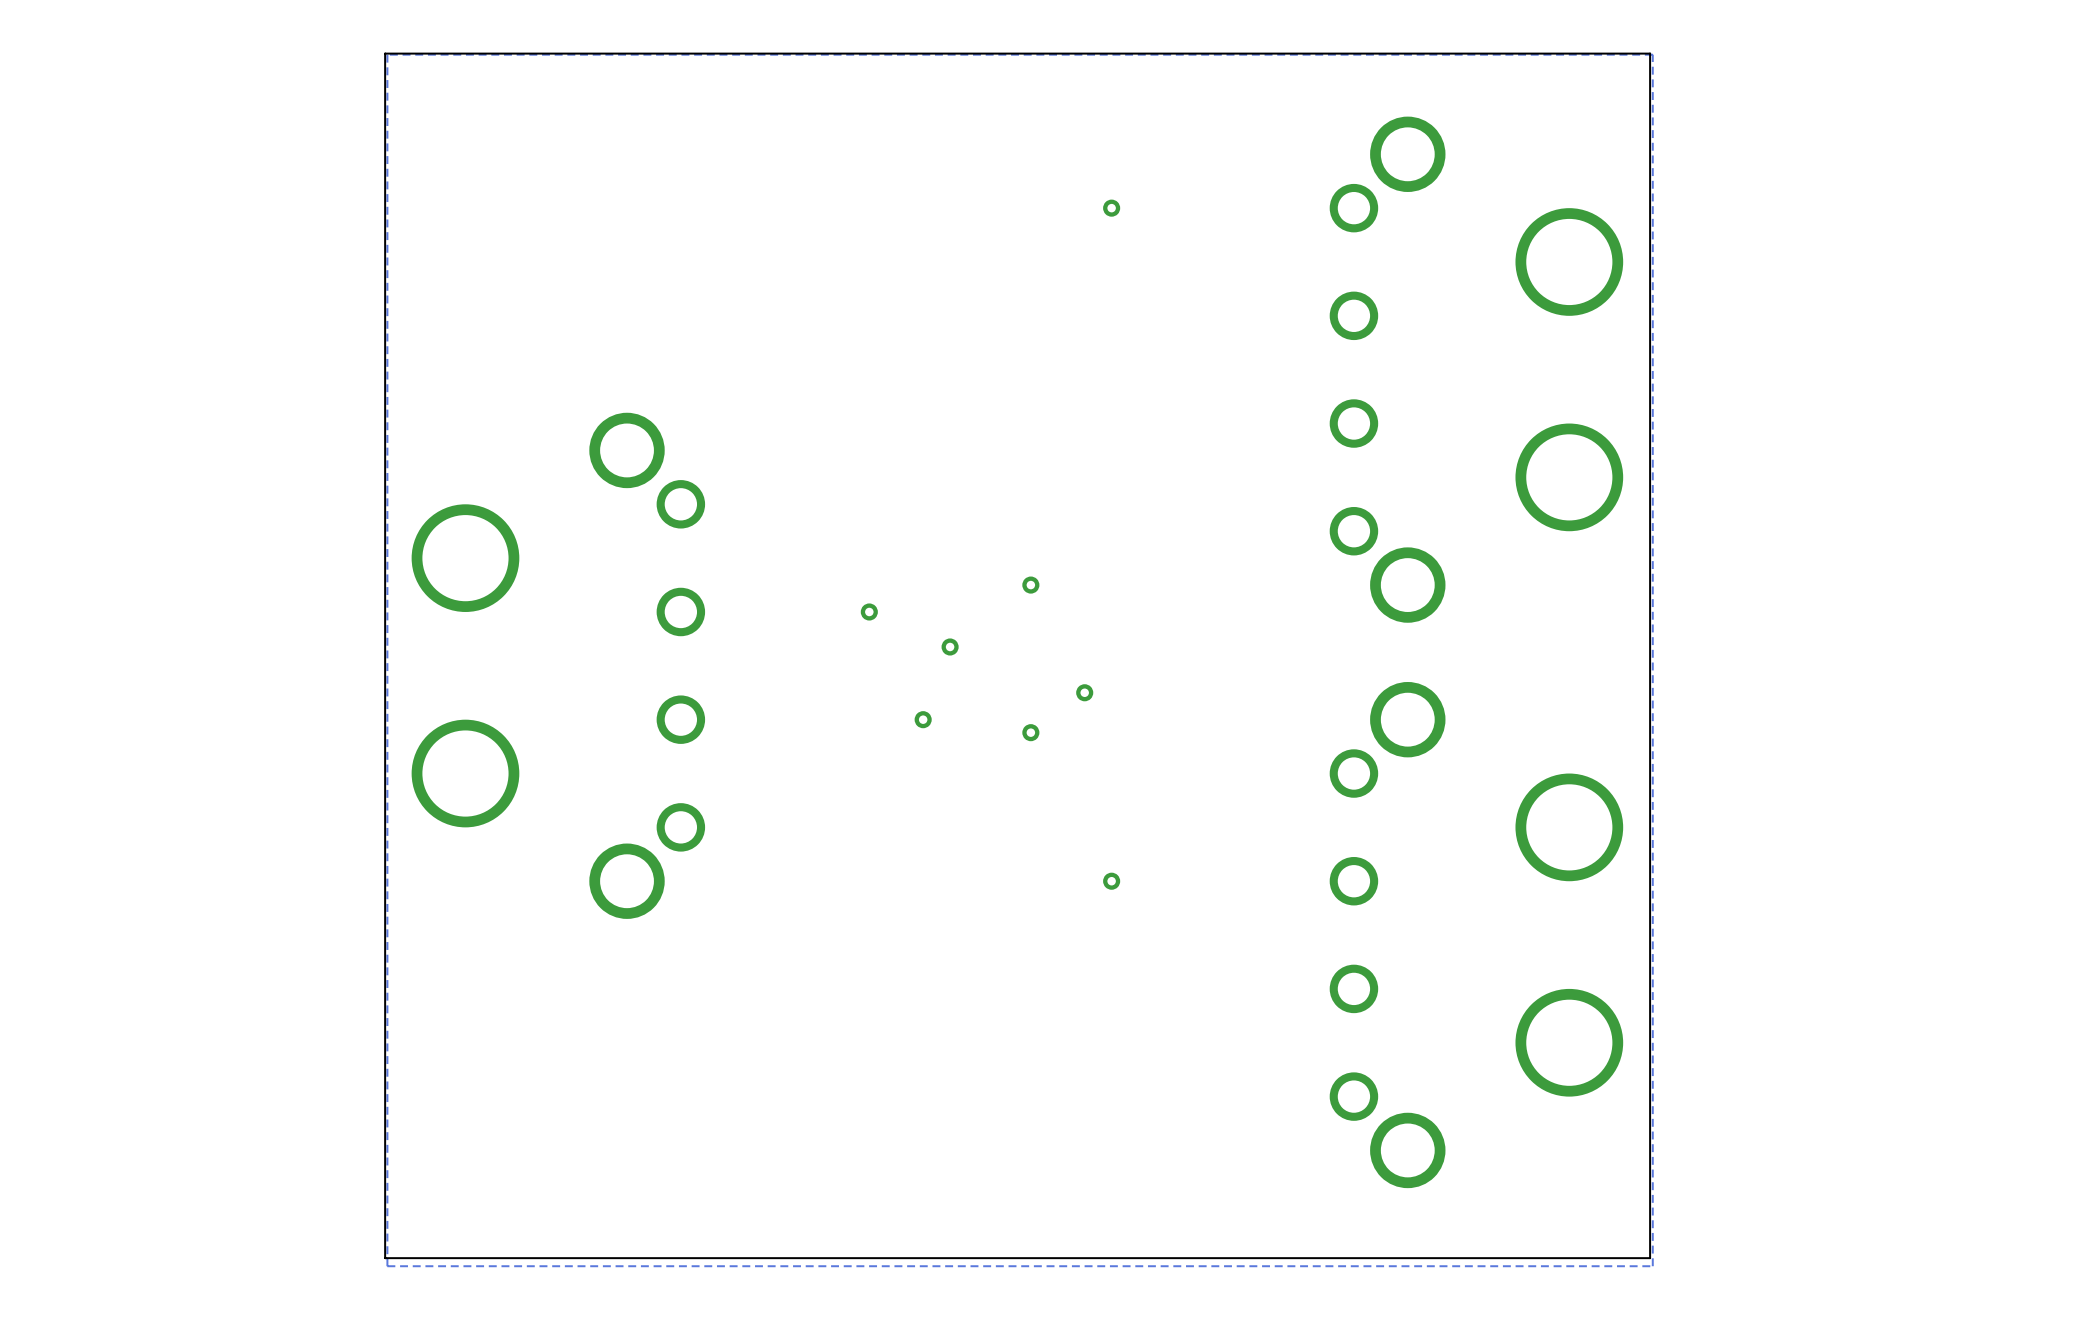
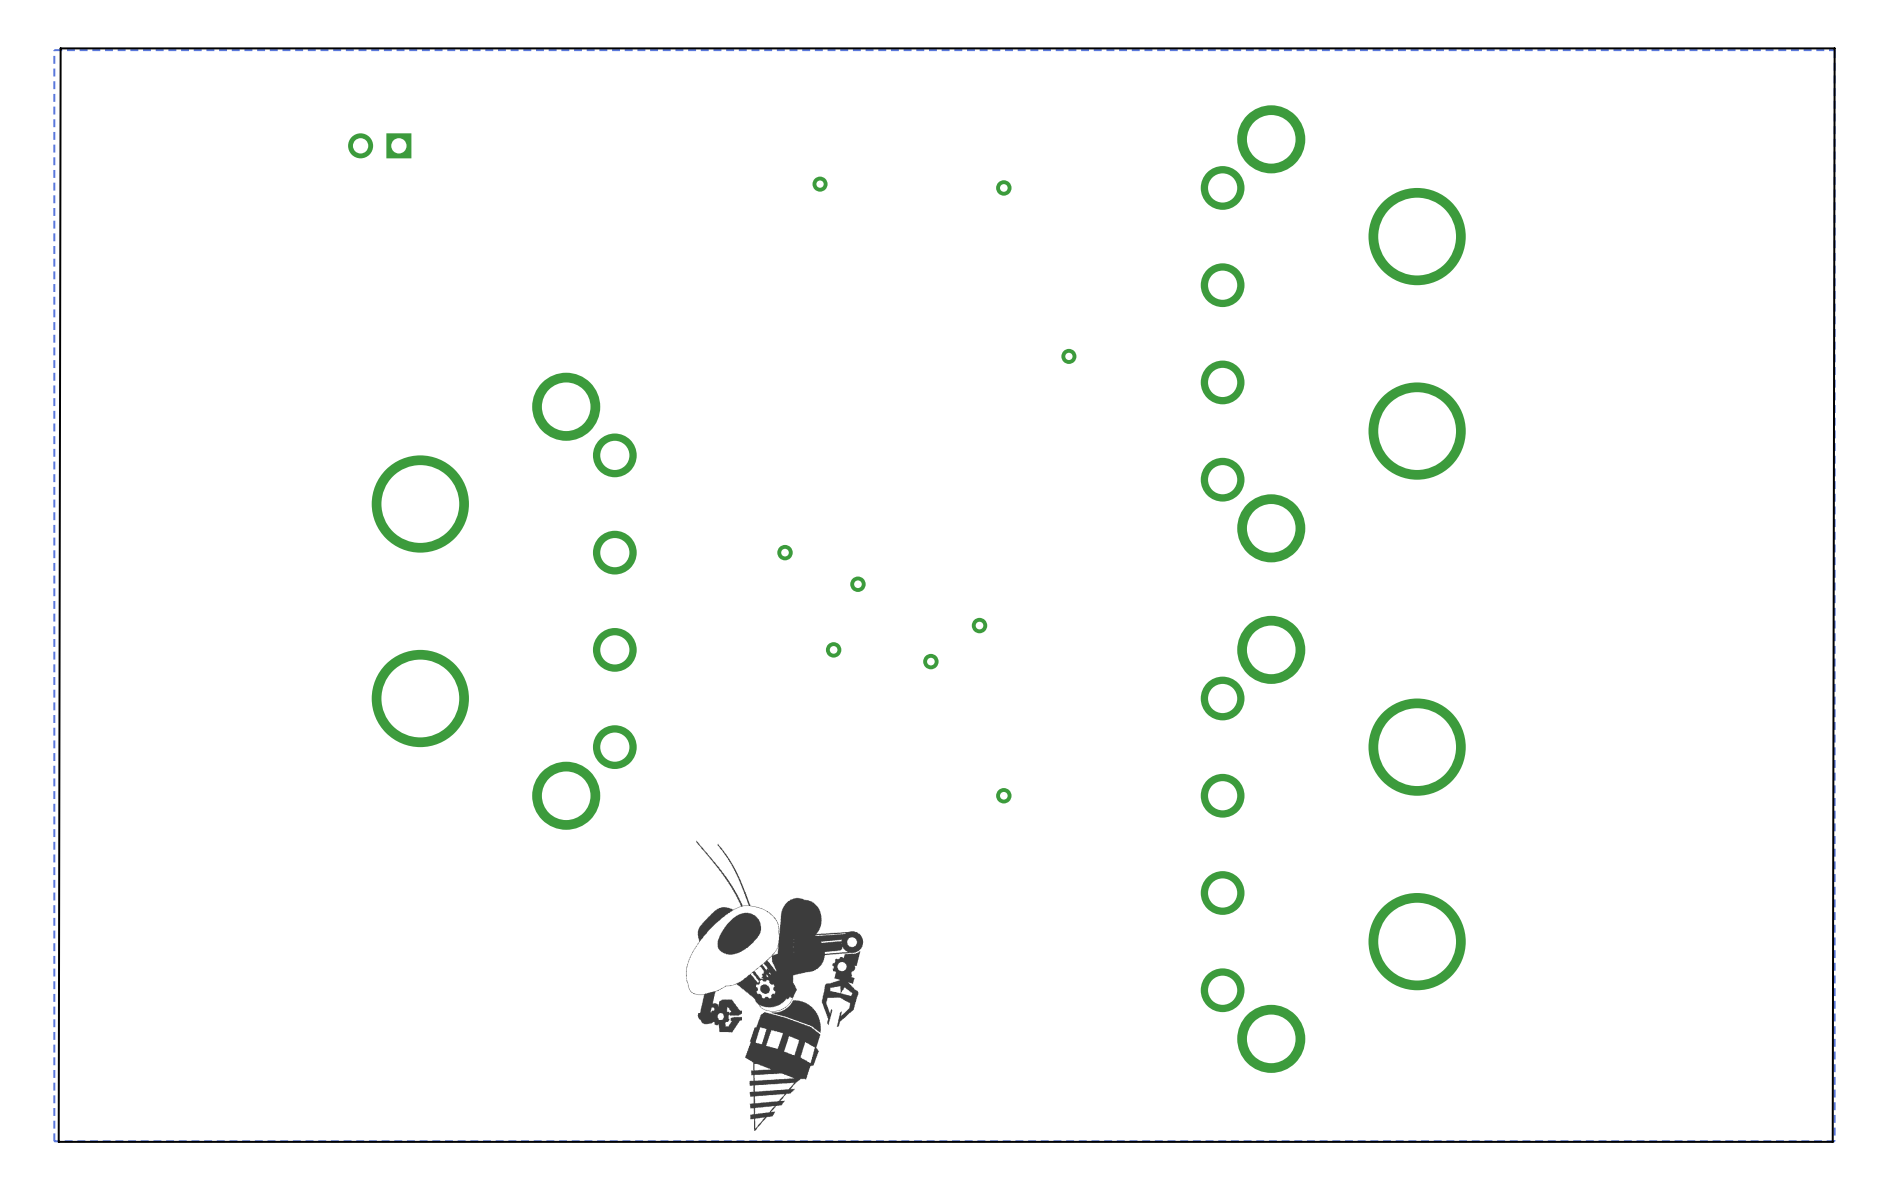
board edge: (1650, 53) (1650, 1258) (385, 1258) (385, 53) -> (1490, 48) (1834, 48) (1832, 1141) (58, 1141) (60, 48) (347, 48)
zone outline: (1652, 54) (387, 54) (387, 1266) (1652, 1266) (1652, 54) -> (1834, 50) (1834, 1141) (54, 1141) (54, 50) (1834, 50)
part: none -> (379, 145)
via: none -> (820, 184)
via: none -> (1068, 356)
via: (1030, 585) -> none
drawing: none -> [685, 840, 864, 1131]

